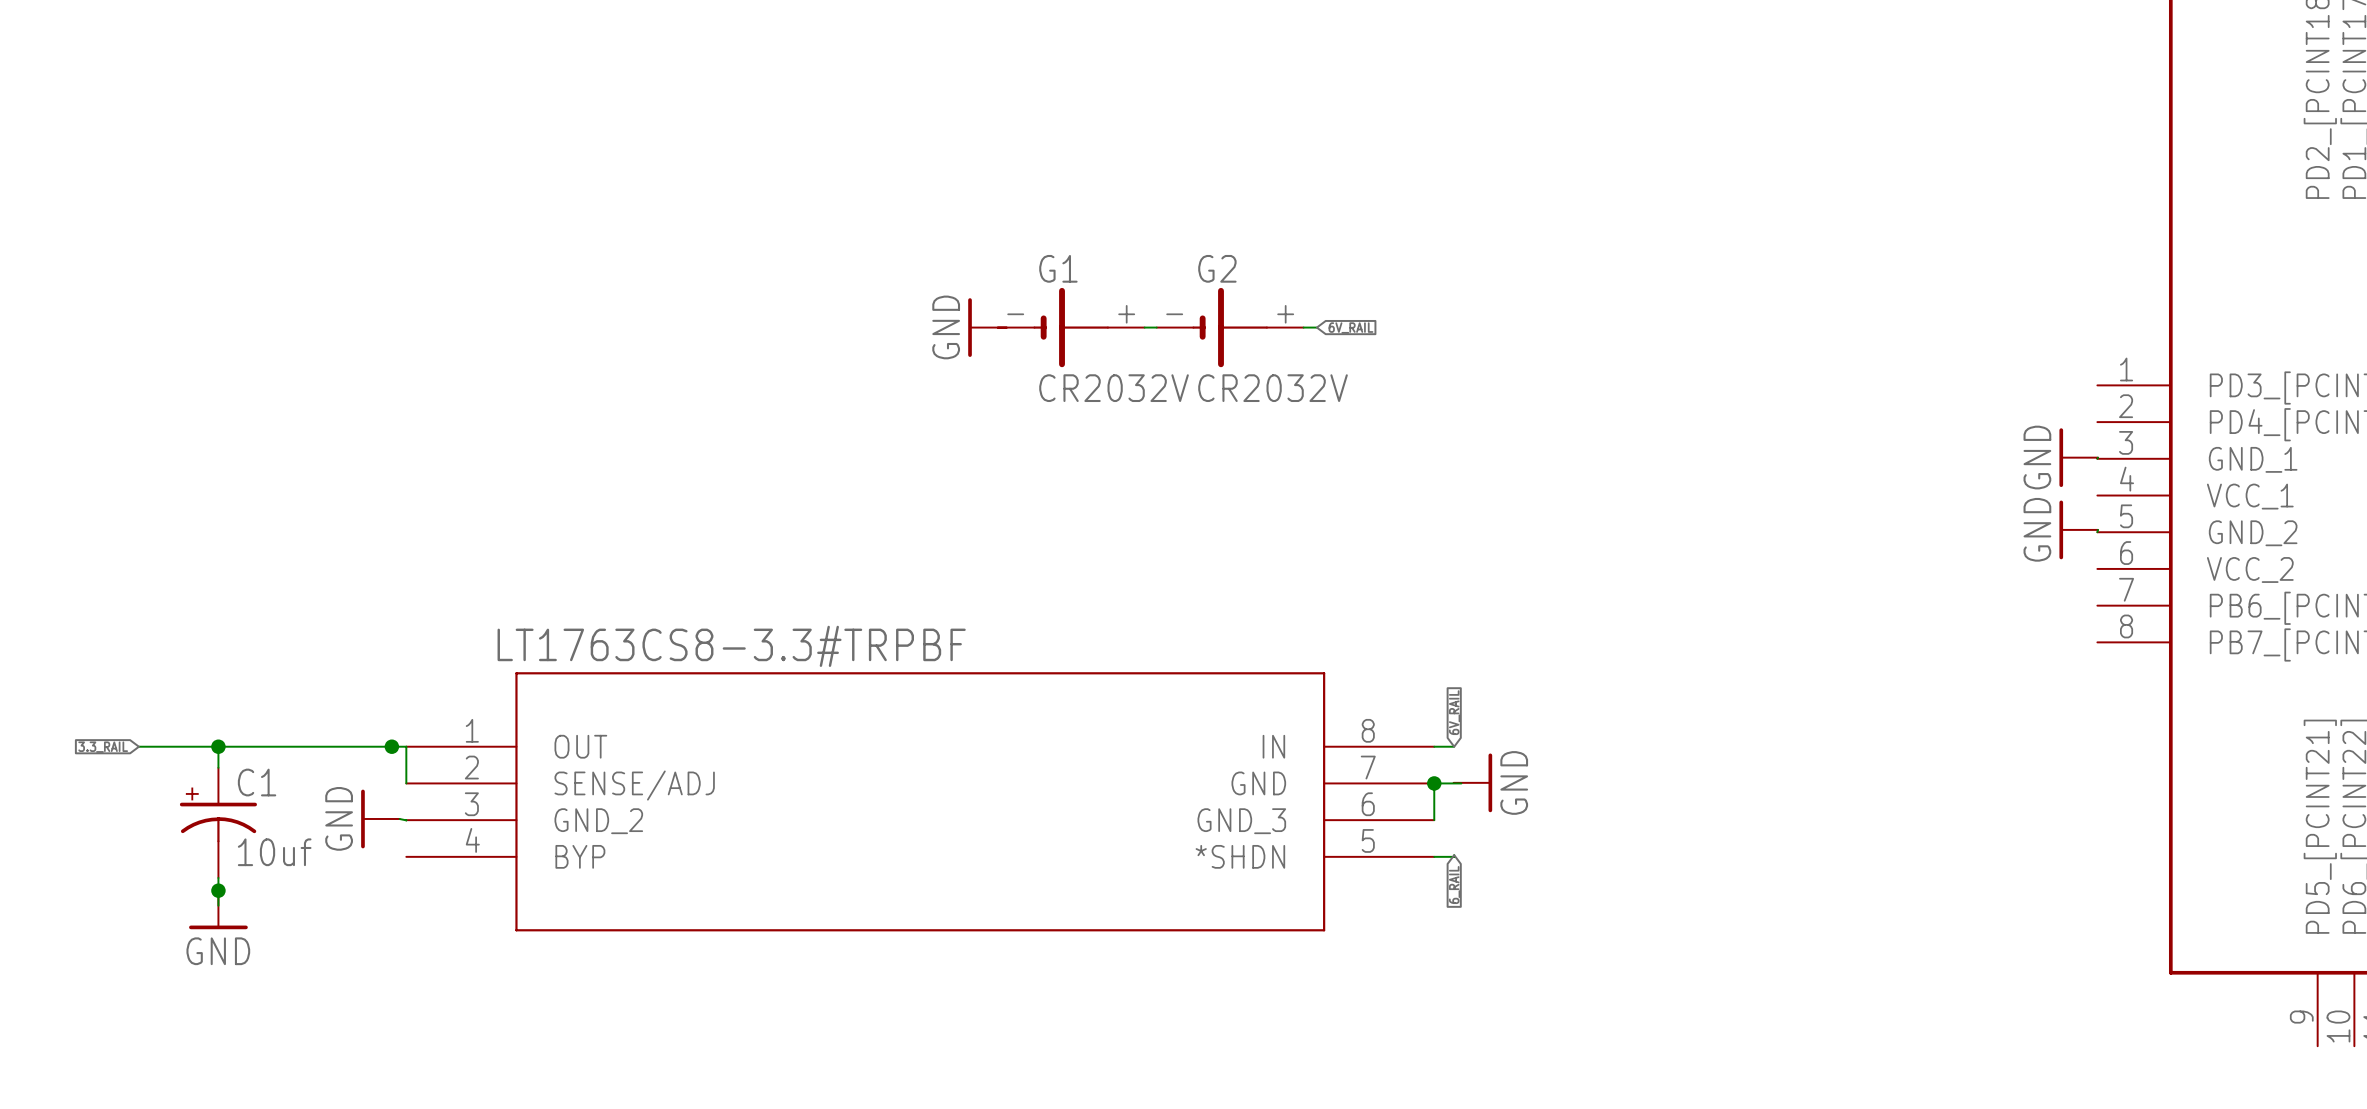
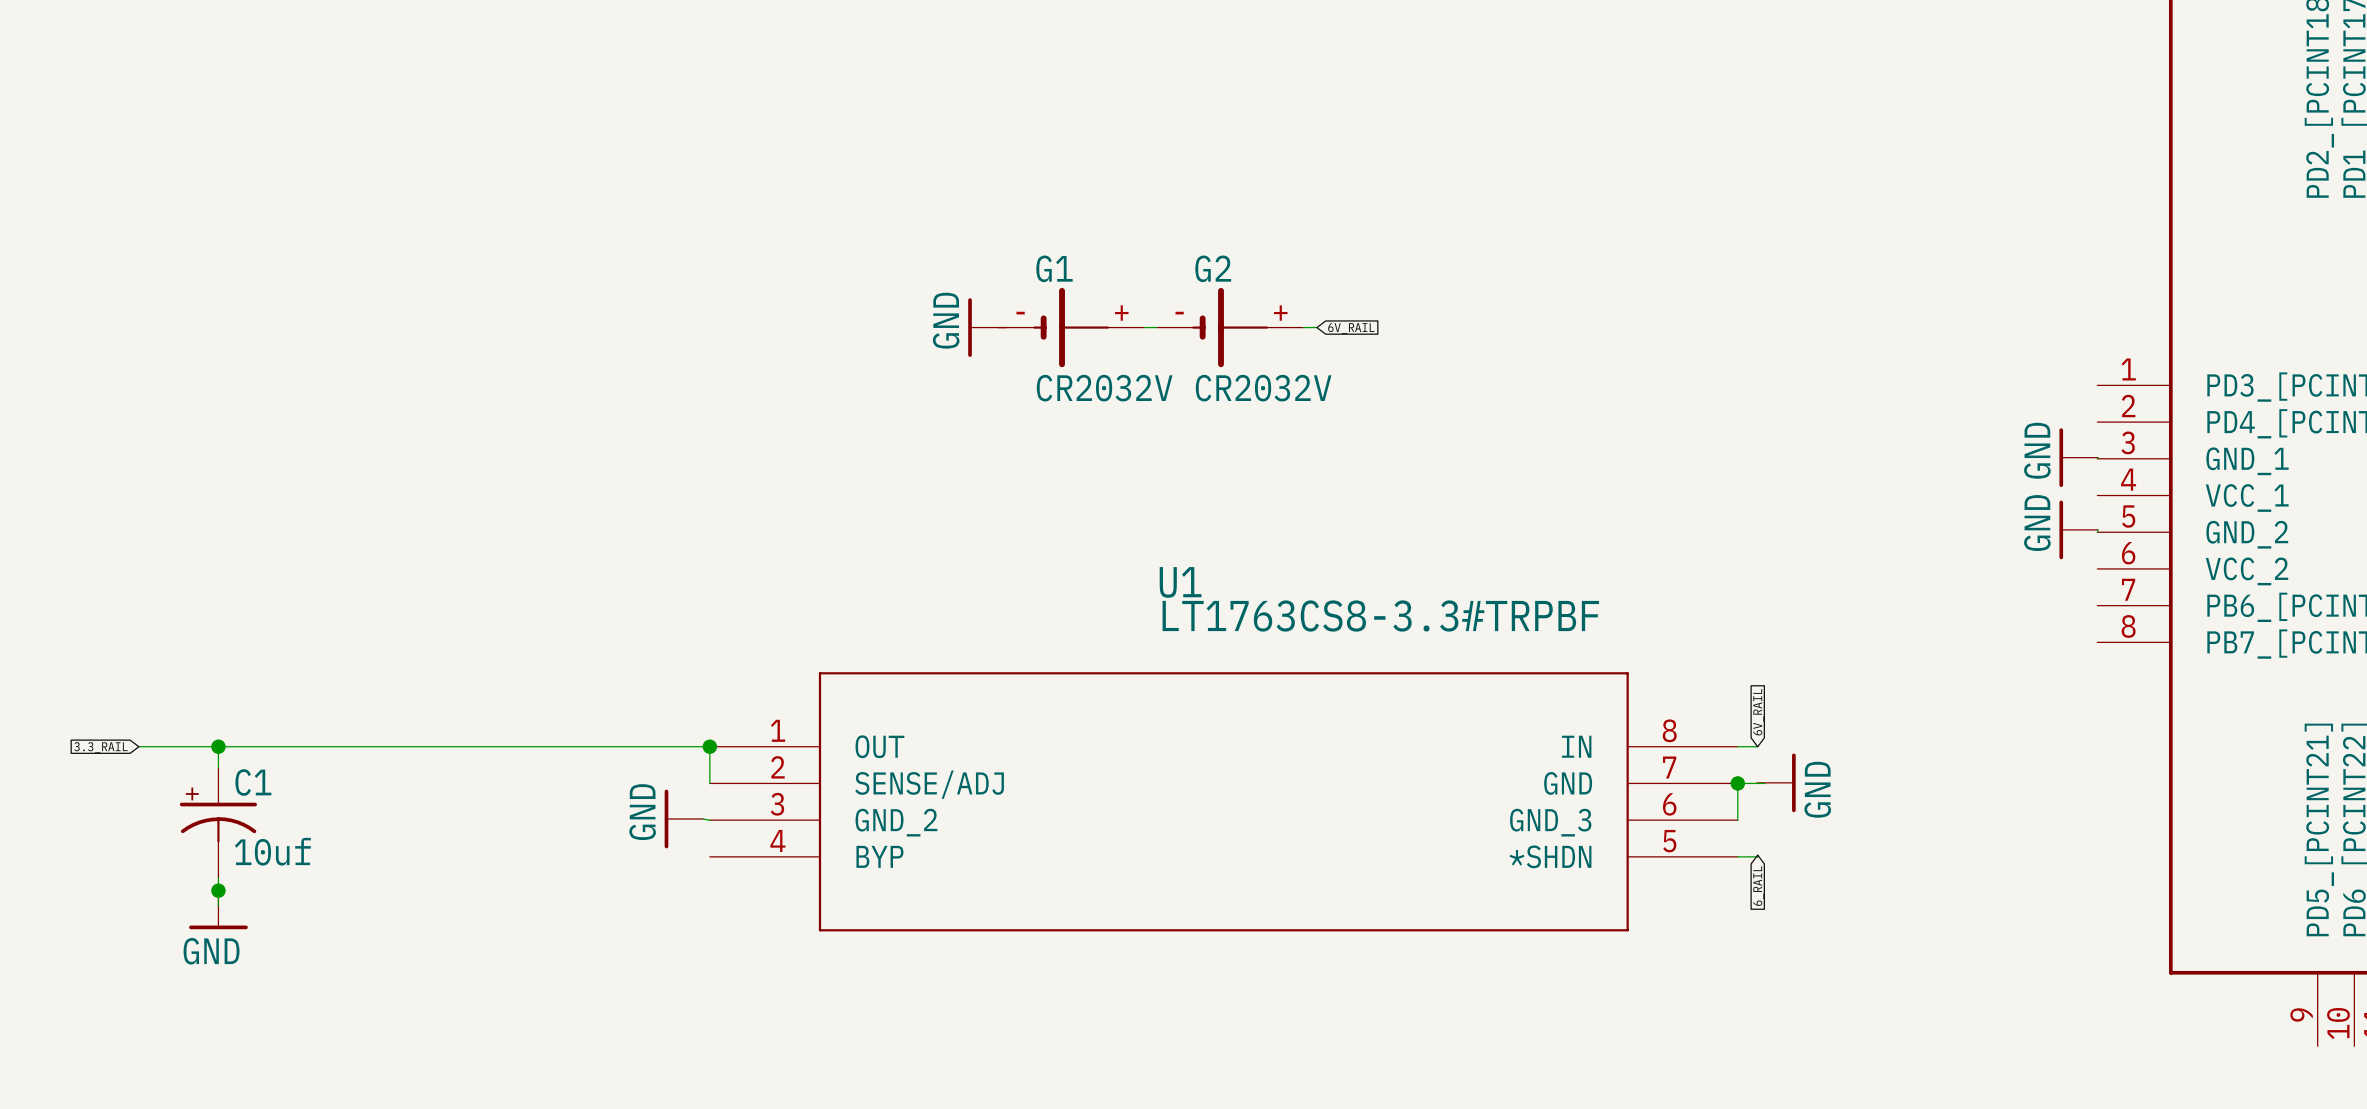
global label position: 6V_RAIL (1454, 712) -> 6V_RAIL (1758, 712)
junction: (391, 746) -> none
wire: (406, 746) (406, 783) -> (406, 746) (709, 746) (709, 783)
junction: none -> (709, 746)
wire: (1434, 746) (1454, 746) -> (1737, 746) (1757, 746)
power symbol position: GND (1472, 782) -> GND (1776, 782)
junction: (1434, 783) -> none
wire: (1461, 783) (1434, 783) (1434, 820) -> (1764, 783) (1737, 783) (1737, 820)
junction: none -> (1737, 783)
part: LT1763CS8-3.3#TRPBF (920, 801) -> none
U1: none -> LT1763CS8-3.3#TRPBF (1223, 801)
power symbol position: GND (380, 818) -> GND (683, 818)
wire: (399, 818) (406, 820) -> (703, 818) (709, 820)
wire: (1454, 855) (1454, 856) (1434, 856) -> (1757, 855) (1757, 856) (1737, 856)
global label position: 6_RAIL (1454, 885) -> 6_RAIL (1758, 886)

